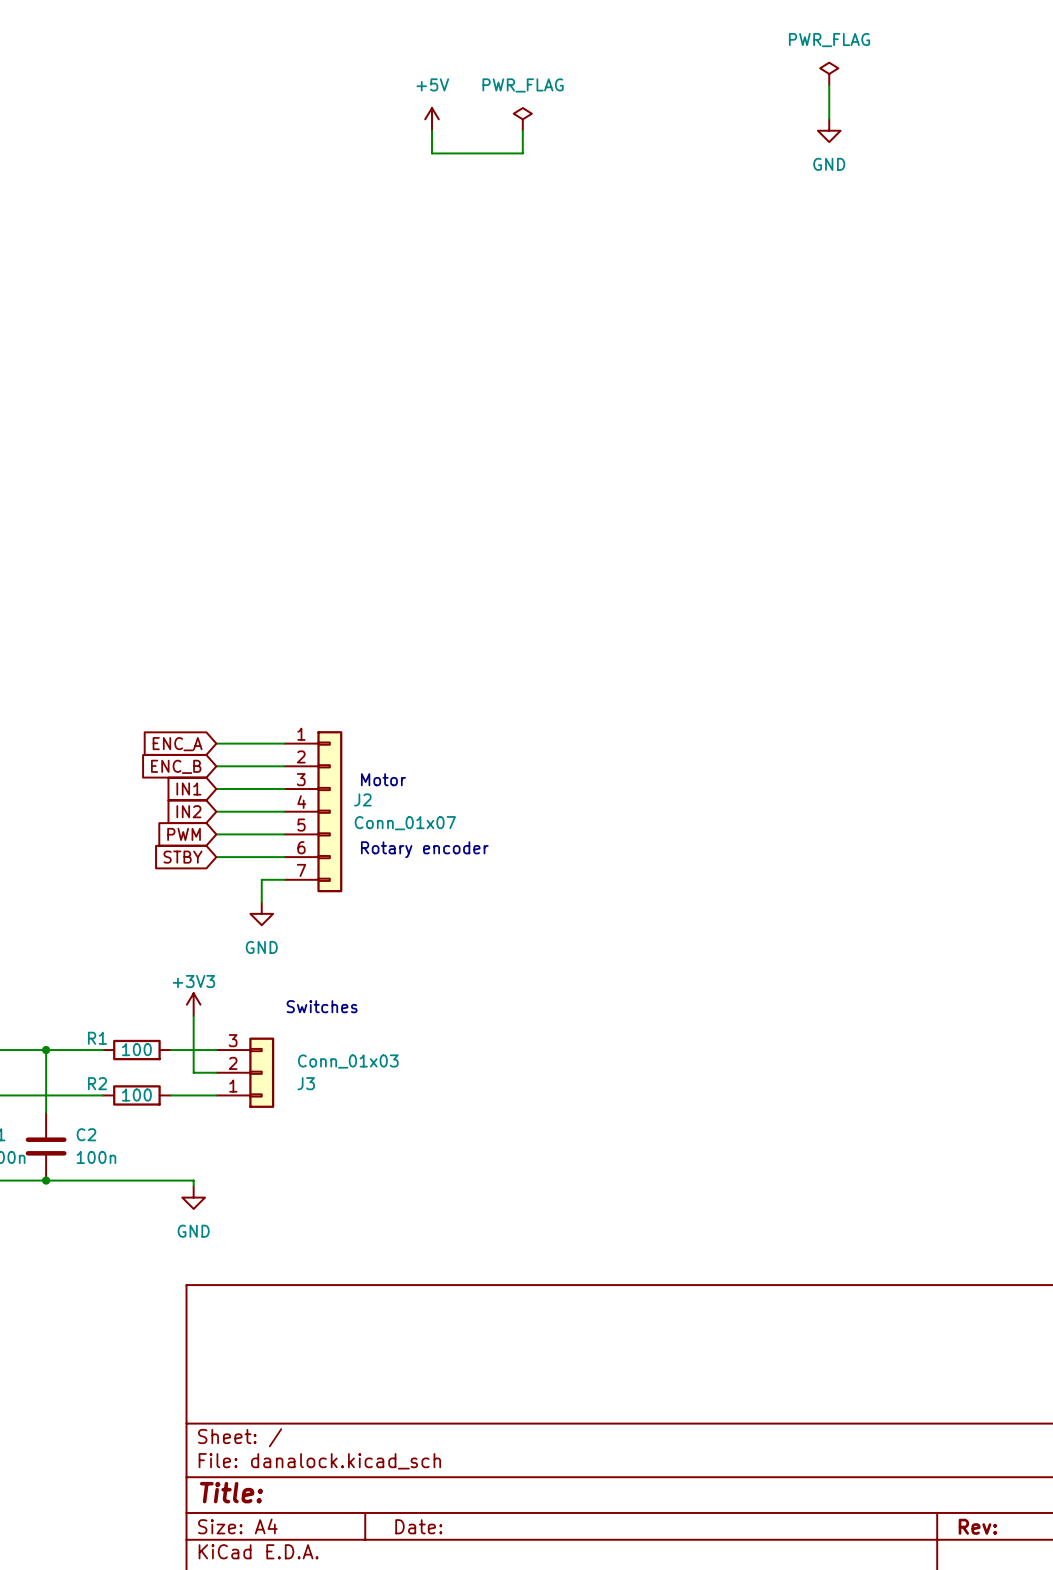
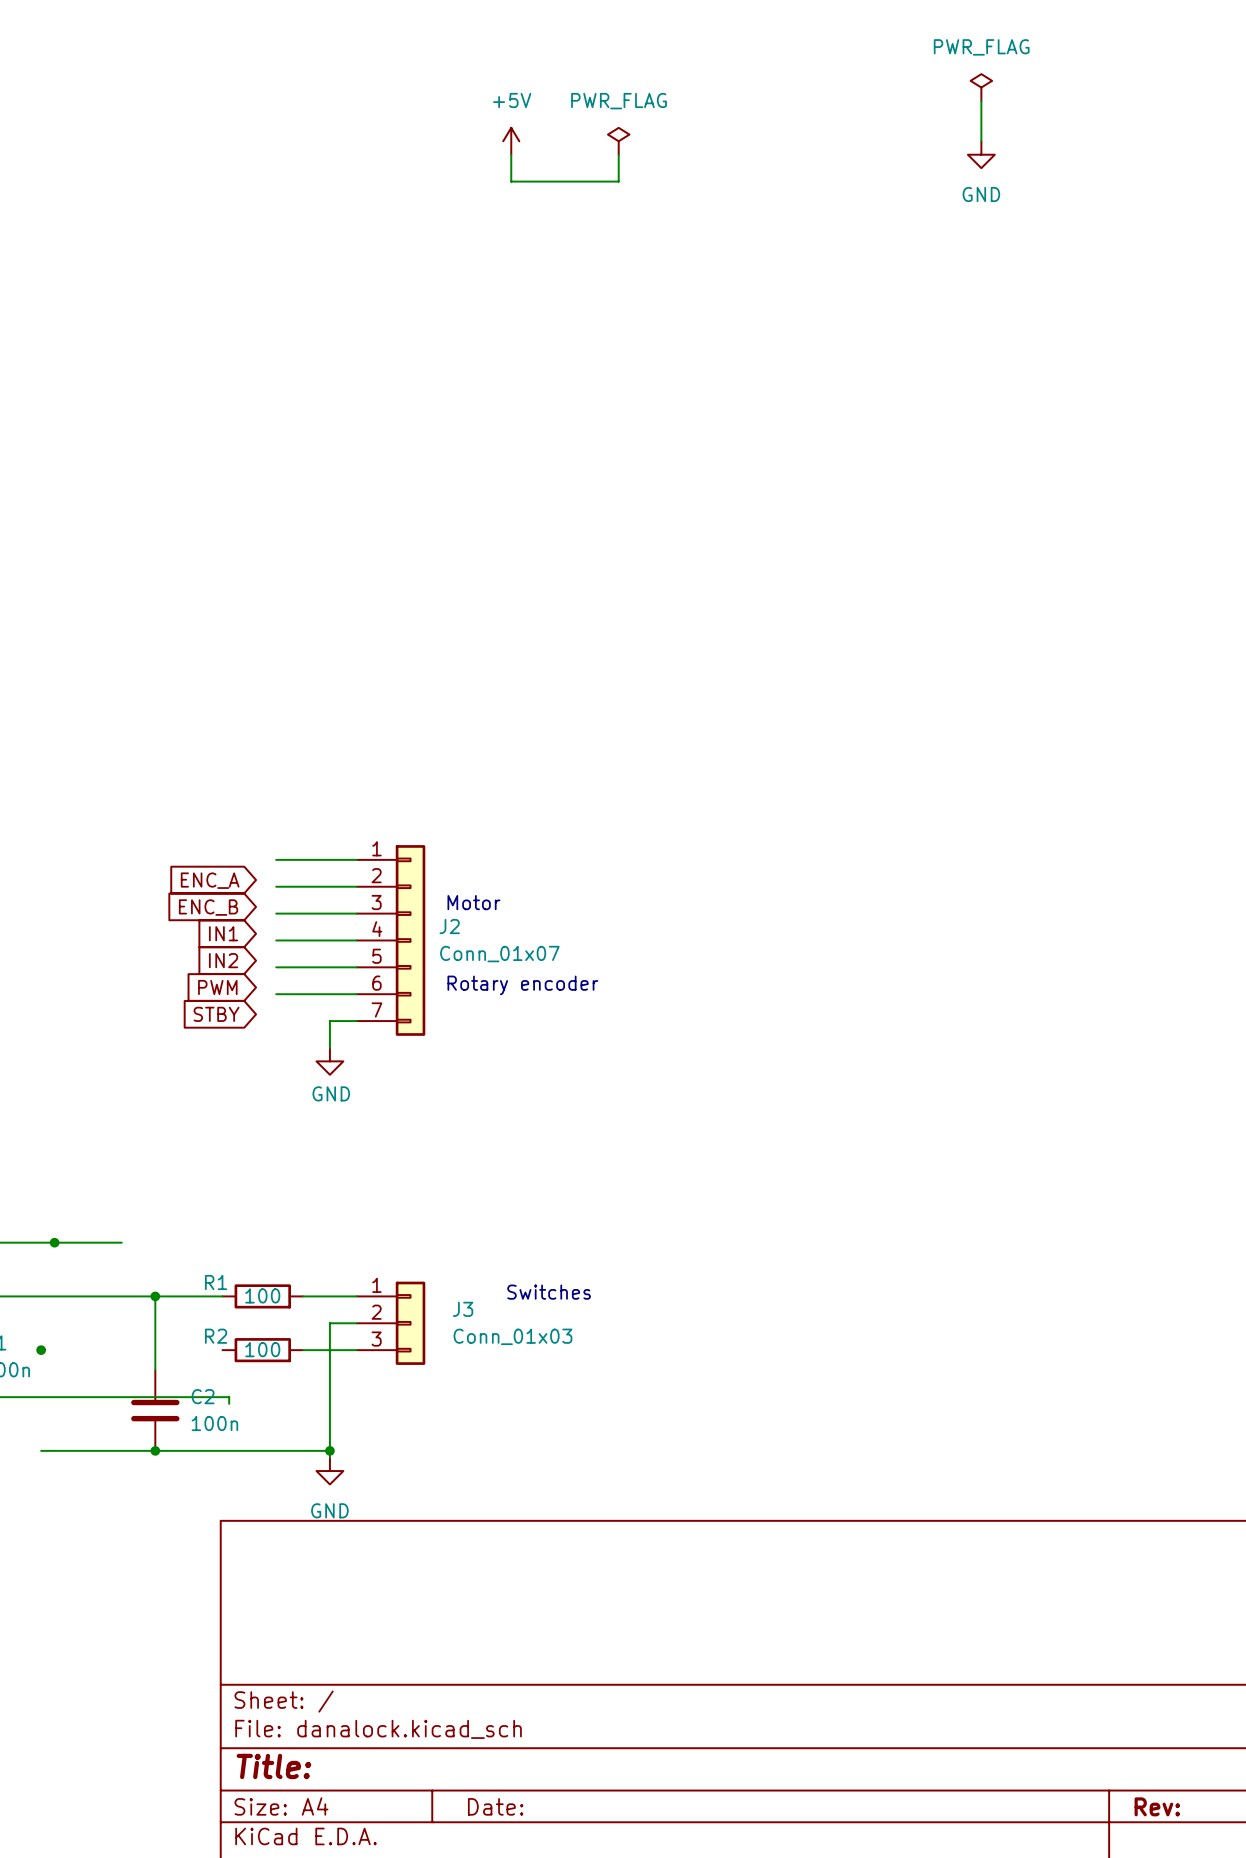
wire: (216, 743) (284, 743) -> (276, 859) (356, 859)
wire: (216, 766) (284, 766) -> (276, 886) (356, 886)
text position: Motor (383, 779) -> Motor (473, 902)
wire: (216, 789) (284, 789) -> (276, 913) (356, 913)
wire: (216, 811) (284, 811) -> (276, 940) (356, 940)
J2 position: (313, 811) -> (391, 940)
wire: (216, 834) (284, 834) -> (276, 967) (356, 967)
text position: Rotary encoder (424, 849) -> Rotary encoder (522, 985)
wire: (216, 857) (284, 857) -> (276, 994) (356, 994)
wire: (284, 879) (261, 879) (261, 902) -> (356, 1021) (329, 1021) (329, 1047)
power symbol position: GND (261, 913) -> GND (329, 1061)
power symbol text position: GND (261, 947) -> GND (331, 1093)
power symbol: +3V3 (193, 1004) -> none
text position: Switches (322, 1006) -> Switches (549, 1292)
wire: (193, 1016) (193, 1072) (216, 1072) -> none
wire: (46, 1050) (46, 1112) -> (155, 1296) (155, 1370)
R1 position: (136, 1050) -> (262, 1296)
wire: (170, 1050) (216, 1050) -> (303, 1296) (356, 1296)
J3 position: (245, 1072) -> (391, 1323)
J3 flip: as is (261, 1072) -> up-down (410, 1323)
wire: none -> (121, 1296) (202, 1296)
junction: none -> (155, 1296)
R2 position: (136, 1095) -> (262, 1350)
wire: (187, 1095) (216, 1095) -> none
wire: none -> (356, 1323) (329, 1323) (329, 1457)
wire: none -> (303, 1350) (356, 1350)
C2 position: (46, 1146) -> (155, 1410)
junction position: (46, 1180) -> (41, 1350)
power symbol position: GND (193, 1197) -> GND (329, 1471)
wire: none -> (41, 1450) (329, 1450)
junction: none -> (155, 1450)
junction: none -> (329, 1450)

